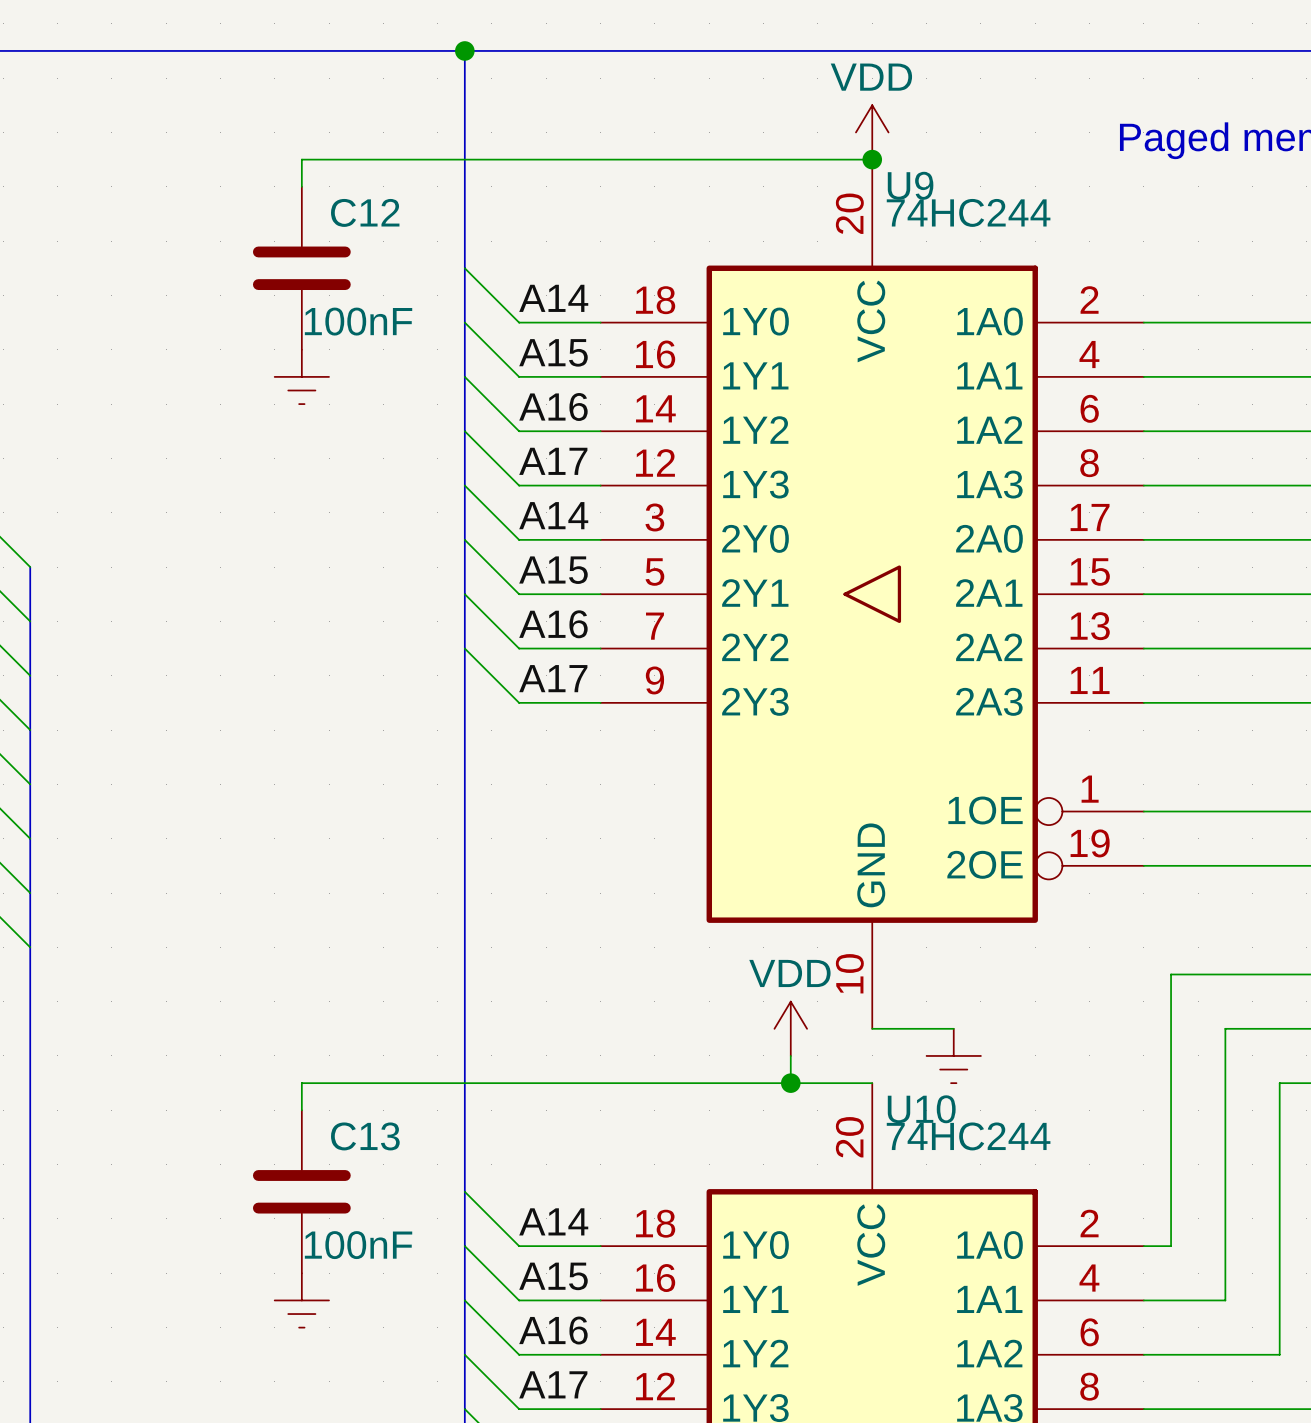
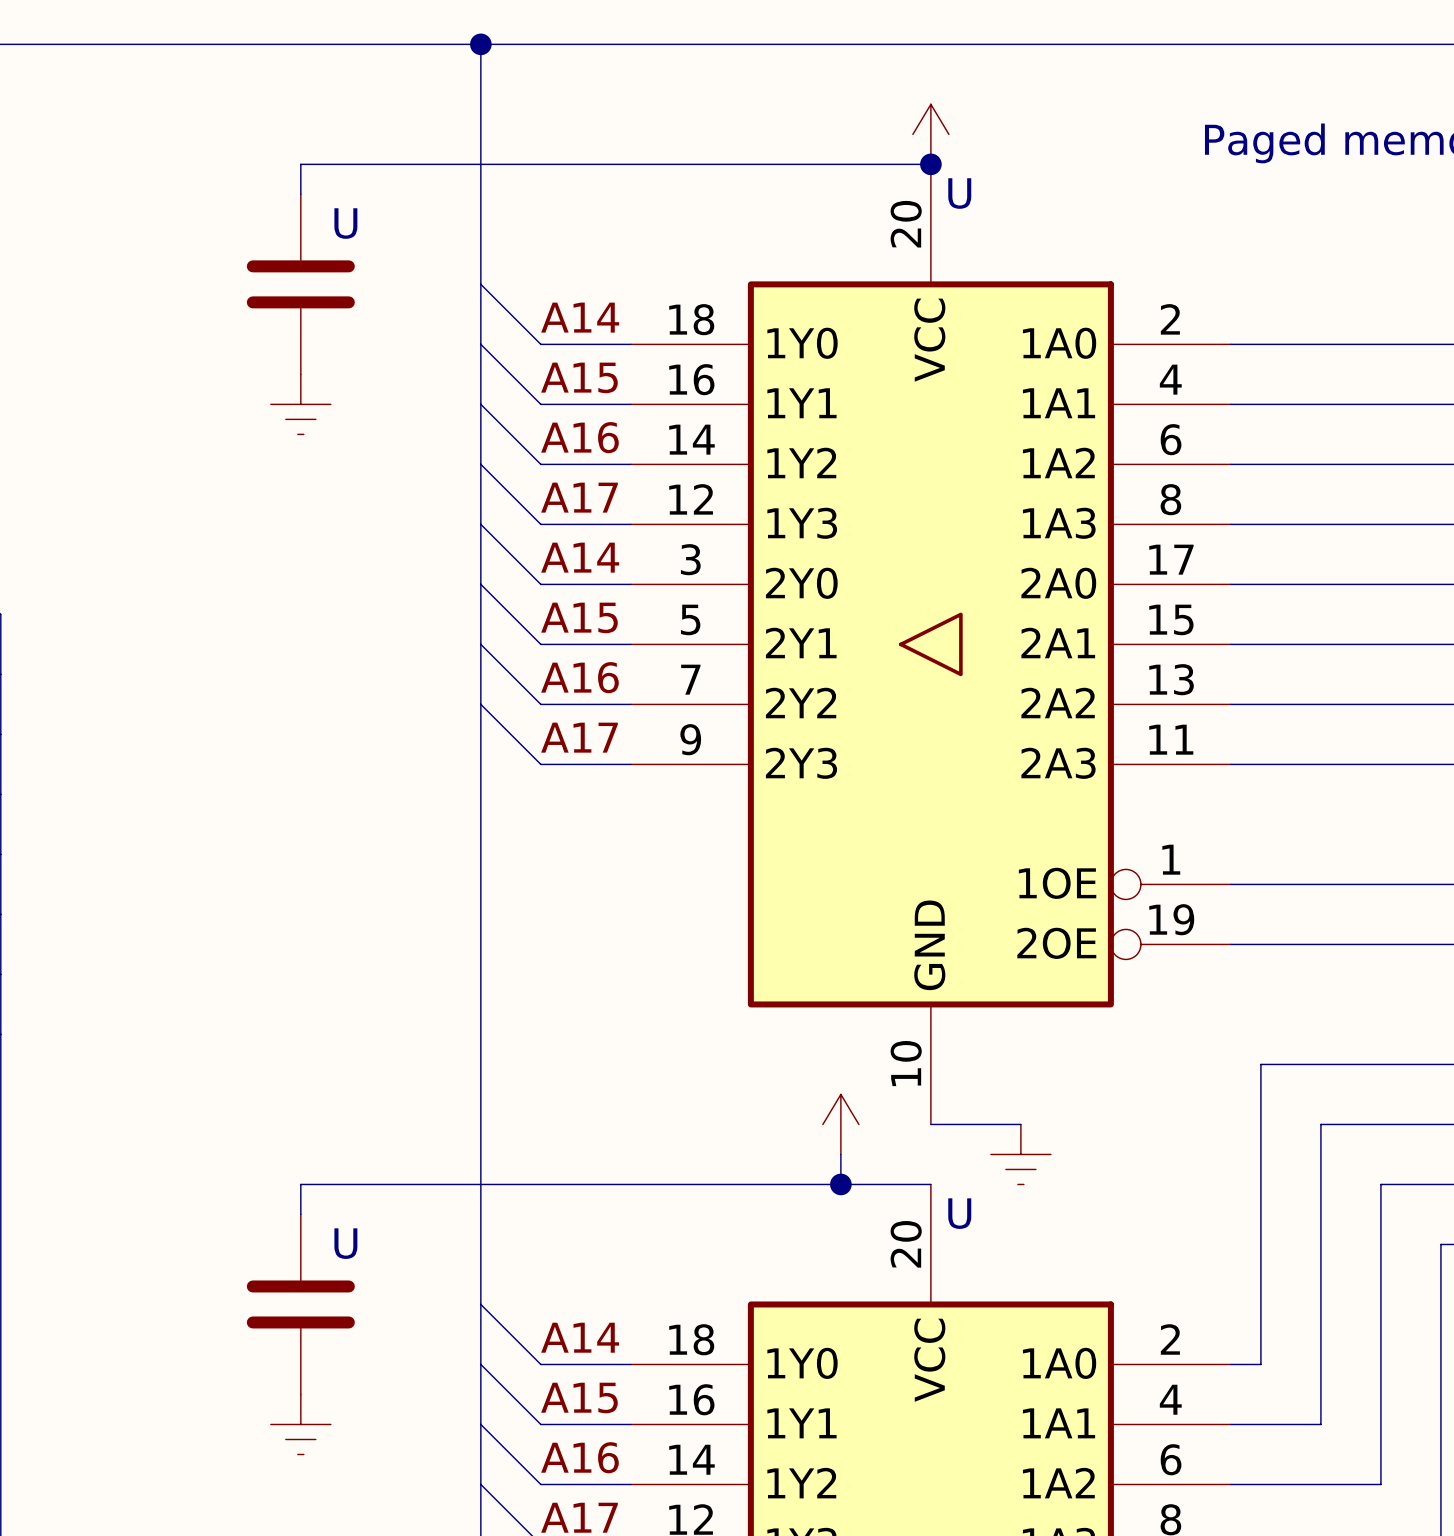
power symbol text: VDD (871, 77) -> none
U9 name: U9 (910, 185) -> U (959, 193)
C12 name: C12 (365, 212) -> U (345, 223)
U9 value: 74HC244 (968, 212) -> none
C12 value: 100nF (358, 321) -> none
power symbol text: VDD (789, 973) -> none
U10 name: U10 (921, 1109) -> U (959, 1213)
C13 name: C13 (365, 1136) -> U (345, 1243)
U10 value: 74HC244 (968, 1136) -> none
C13 value: 100nF (358, 1245) -> none

